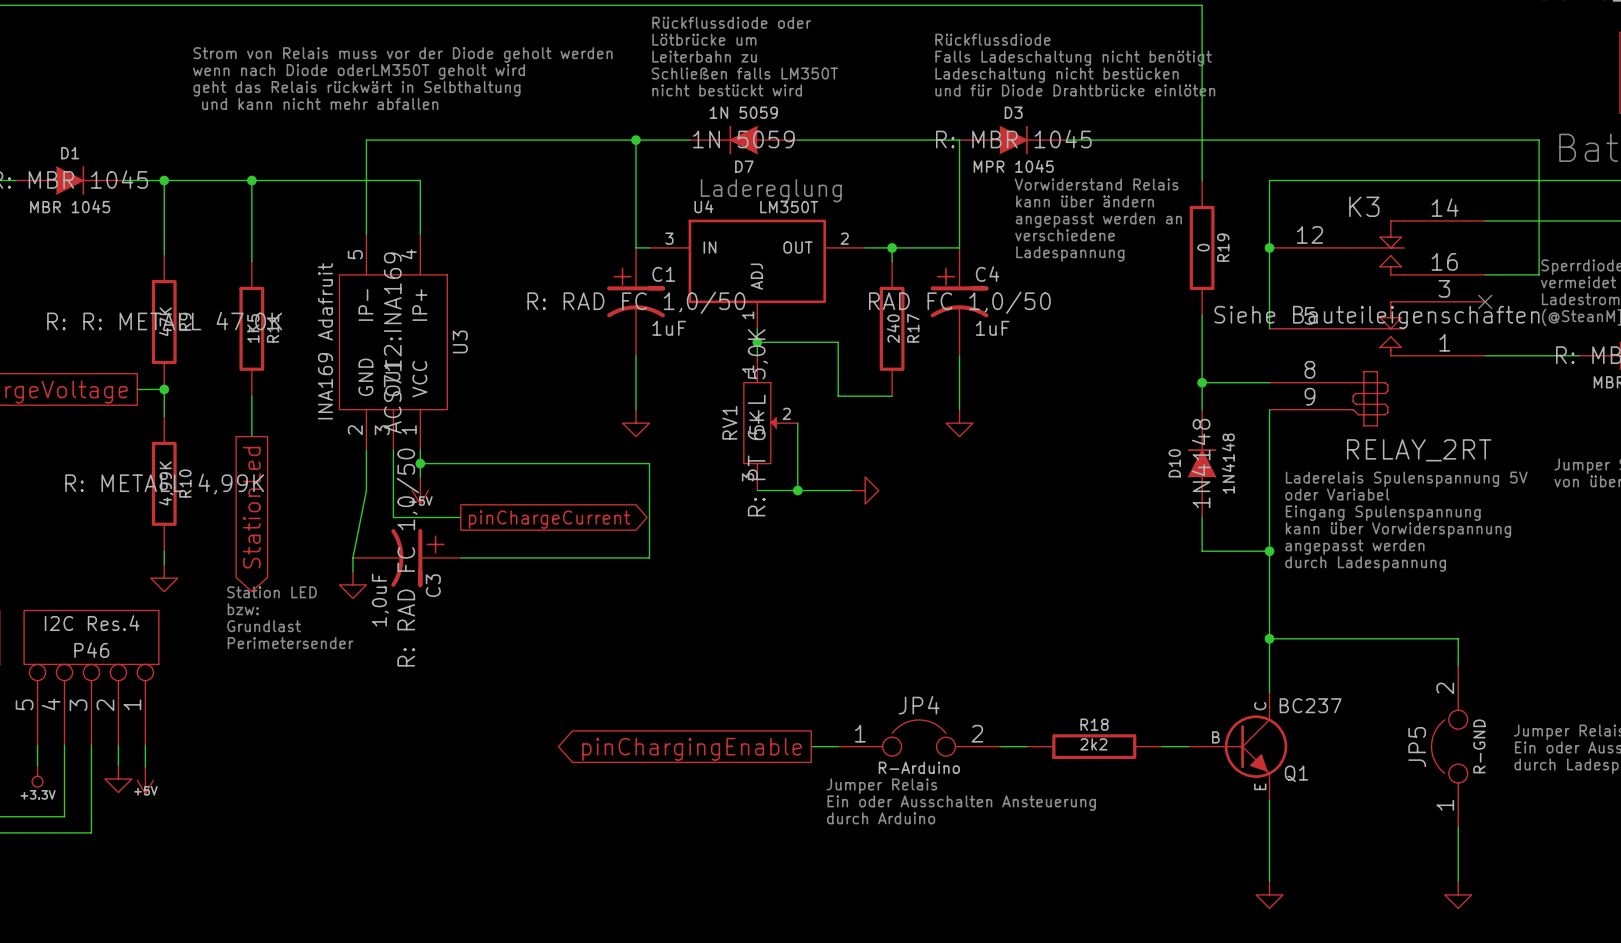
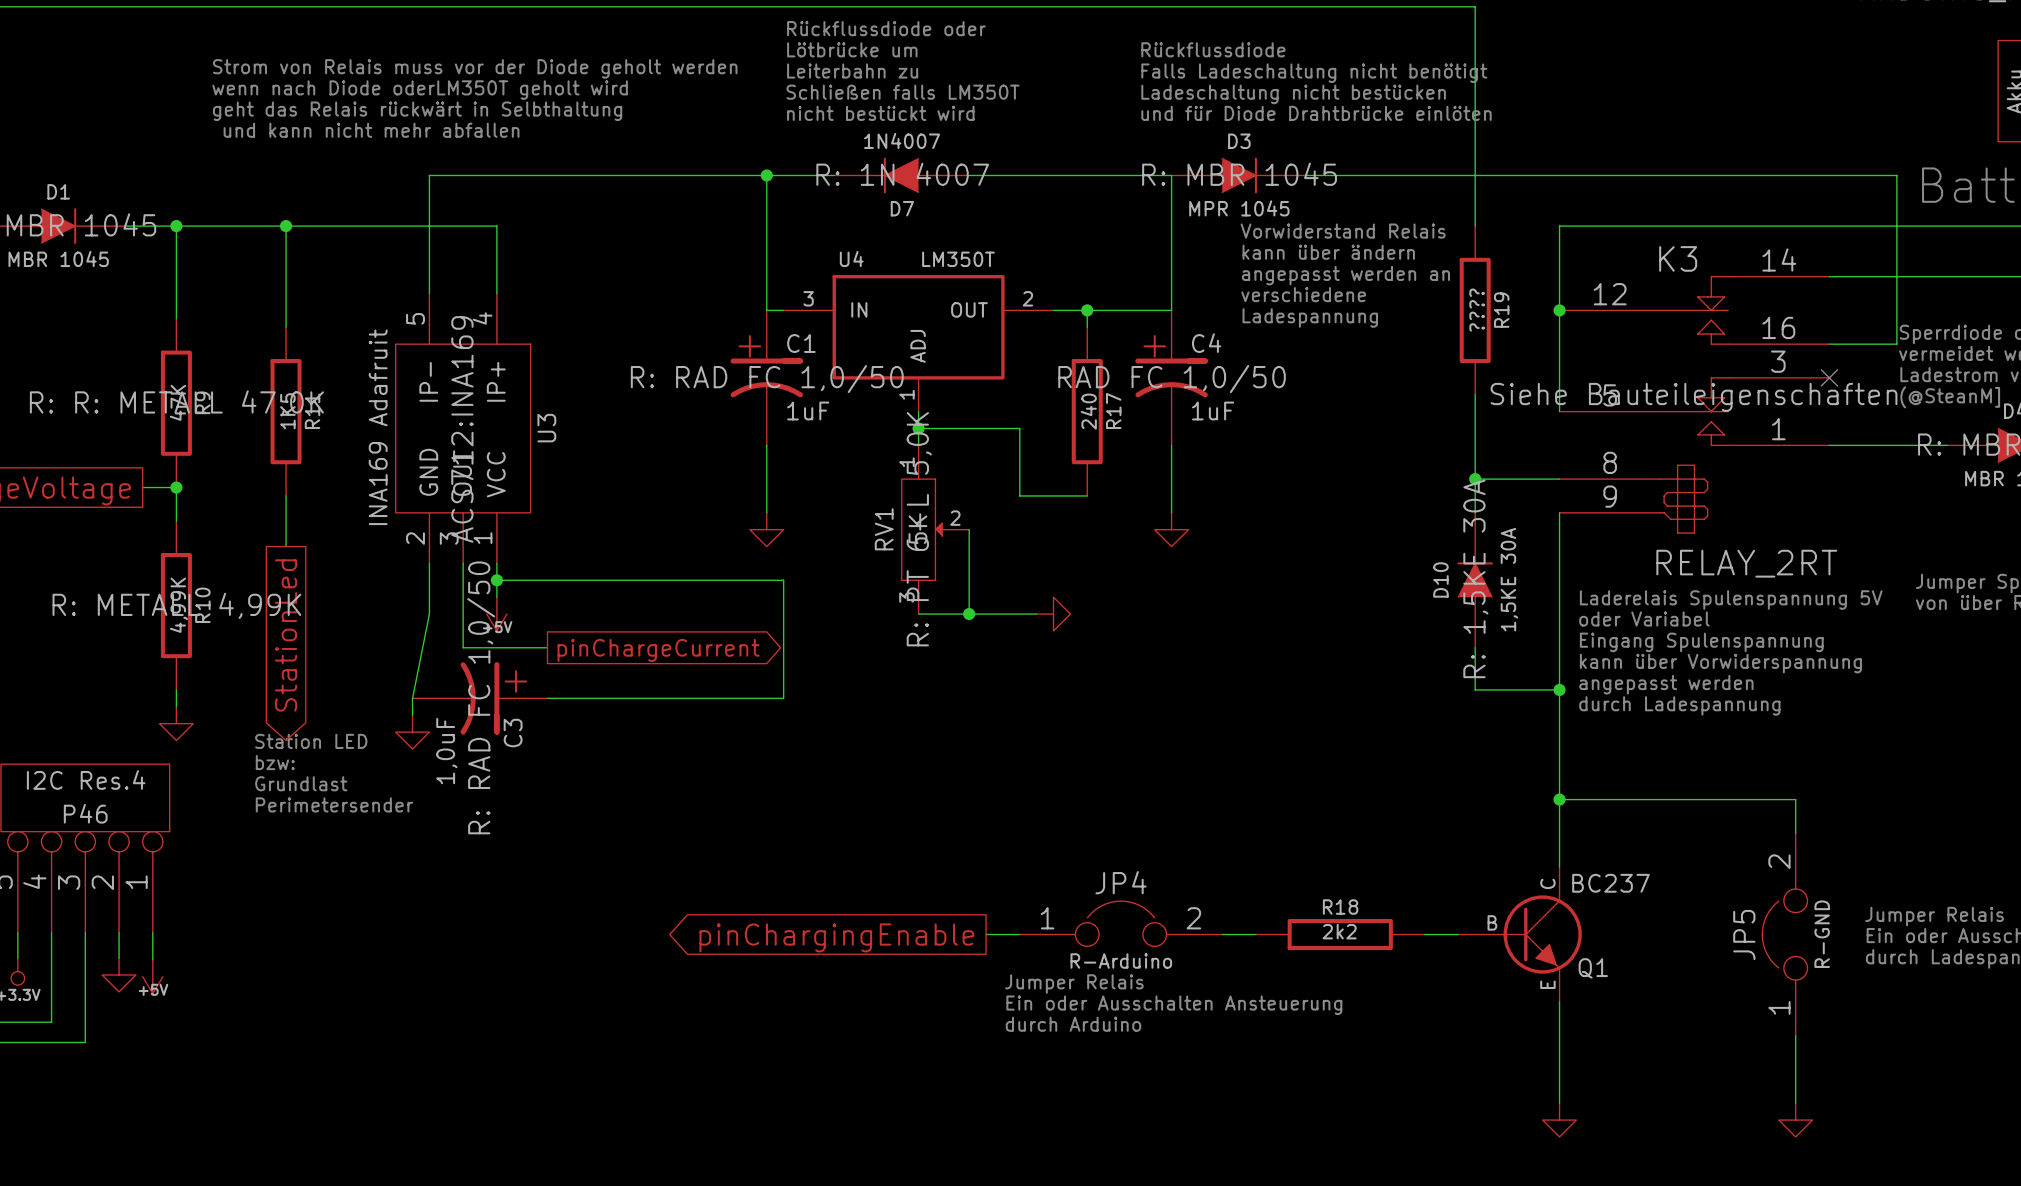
D7 value: 1N 5059 (743, 112) -> 1N4007 (902, 140)
D7 text: 1N 5059 (743, 139) -> R: 1N 4007 (902, 174)
text: Ladereglung (771, 190) -> none
R19 value: 0 (1203, 247) -> ???? (1477, 310)
D10 text: 1N4148 (1201, 463) -> R: 1,5KE 30A (1475, 578)
D10 value: 1N4148 (1228, 463) -> 1,5KE 30A (1509, 579)

